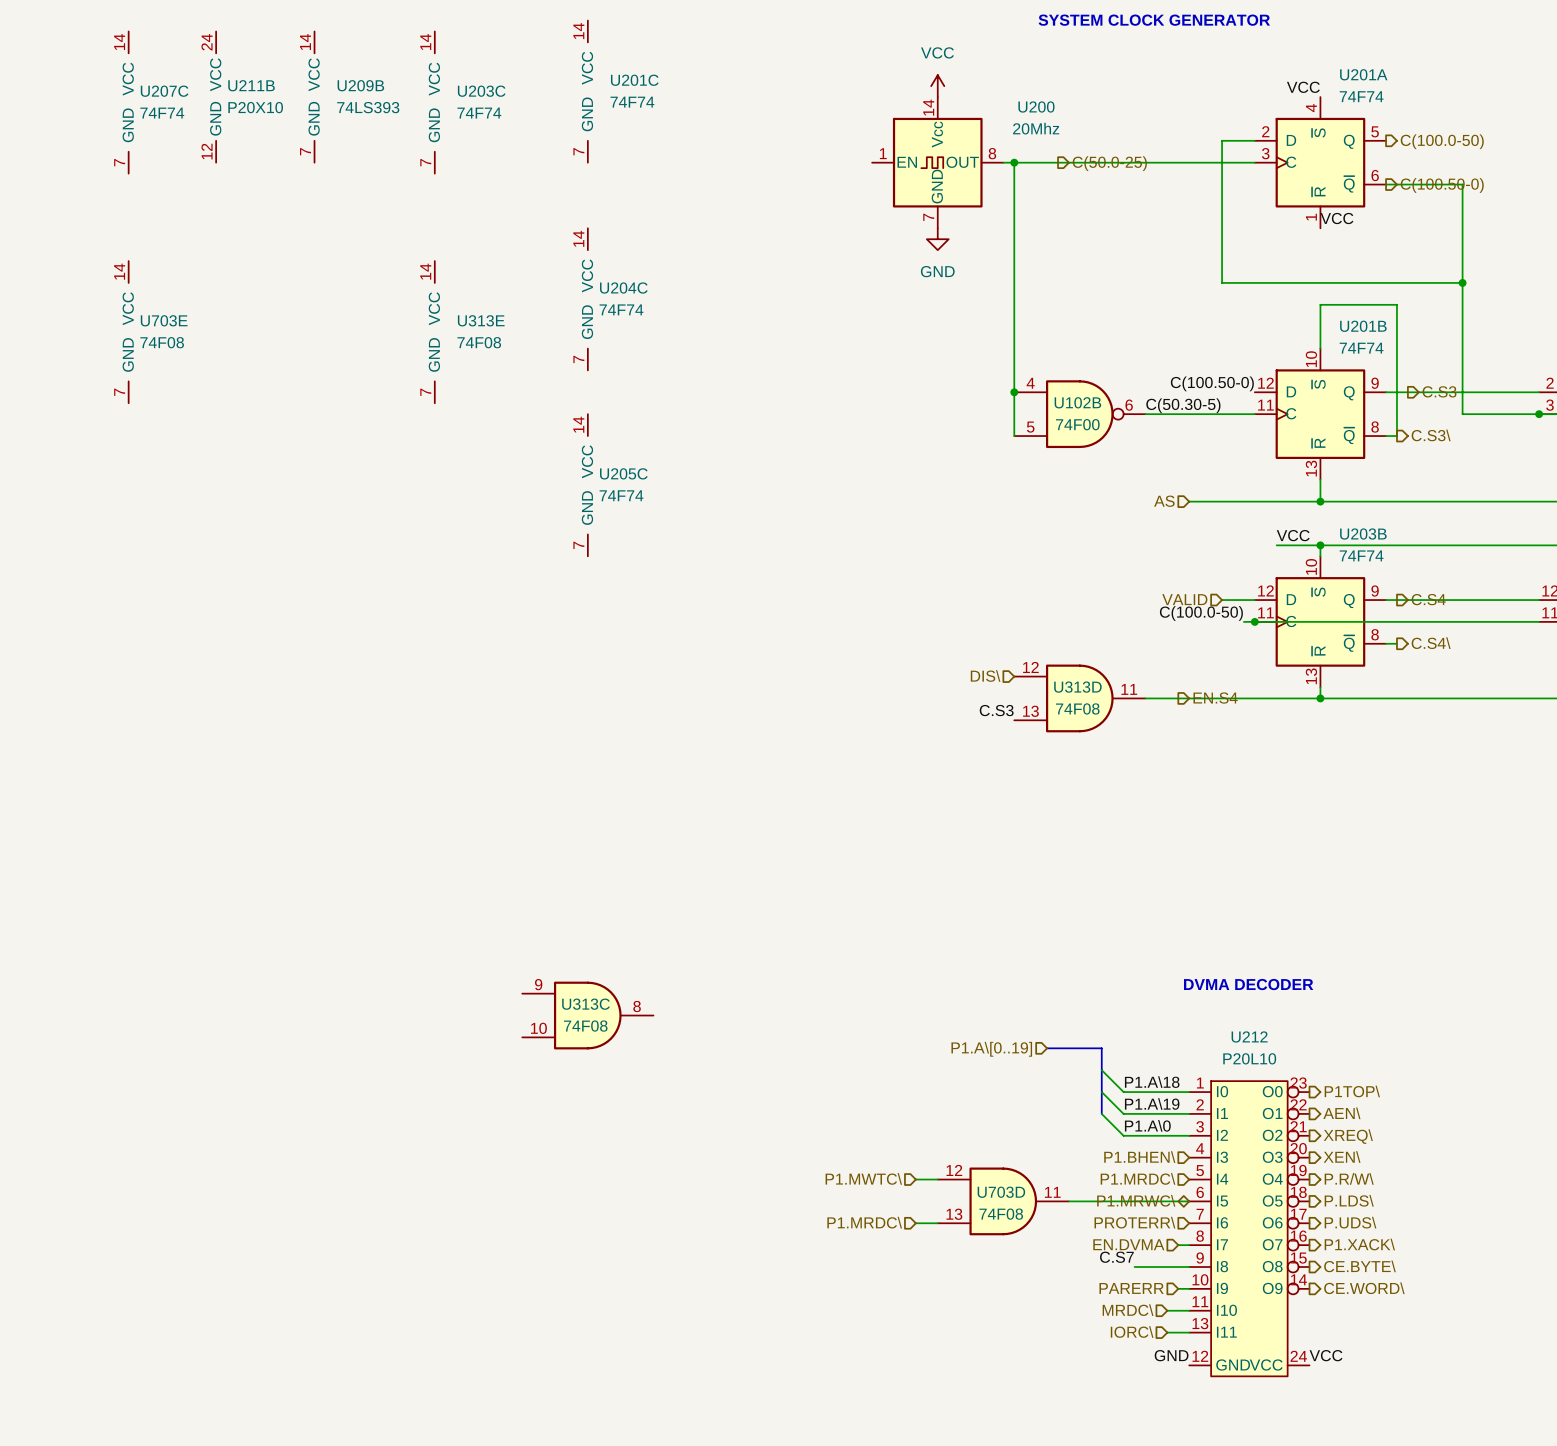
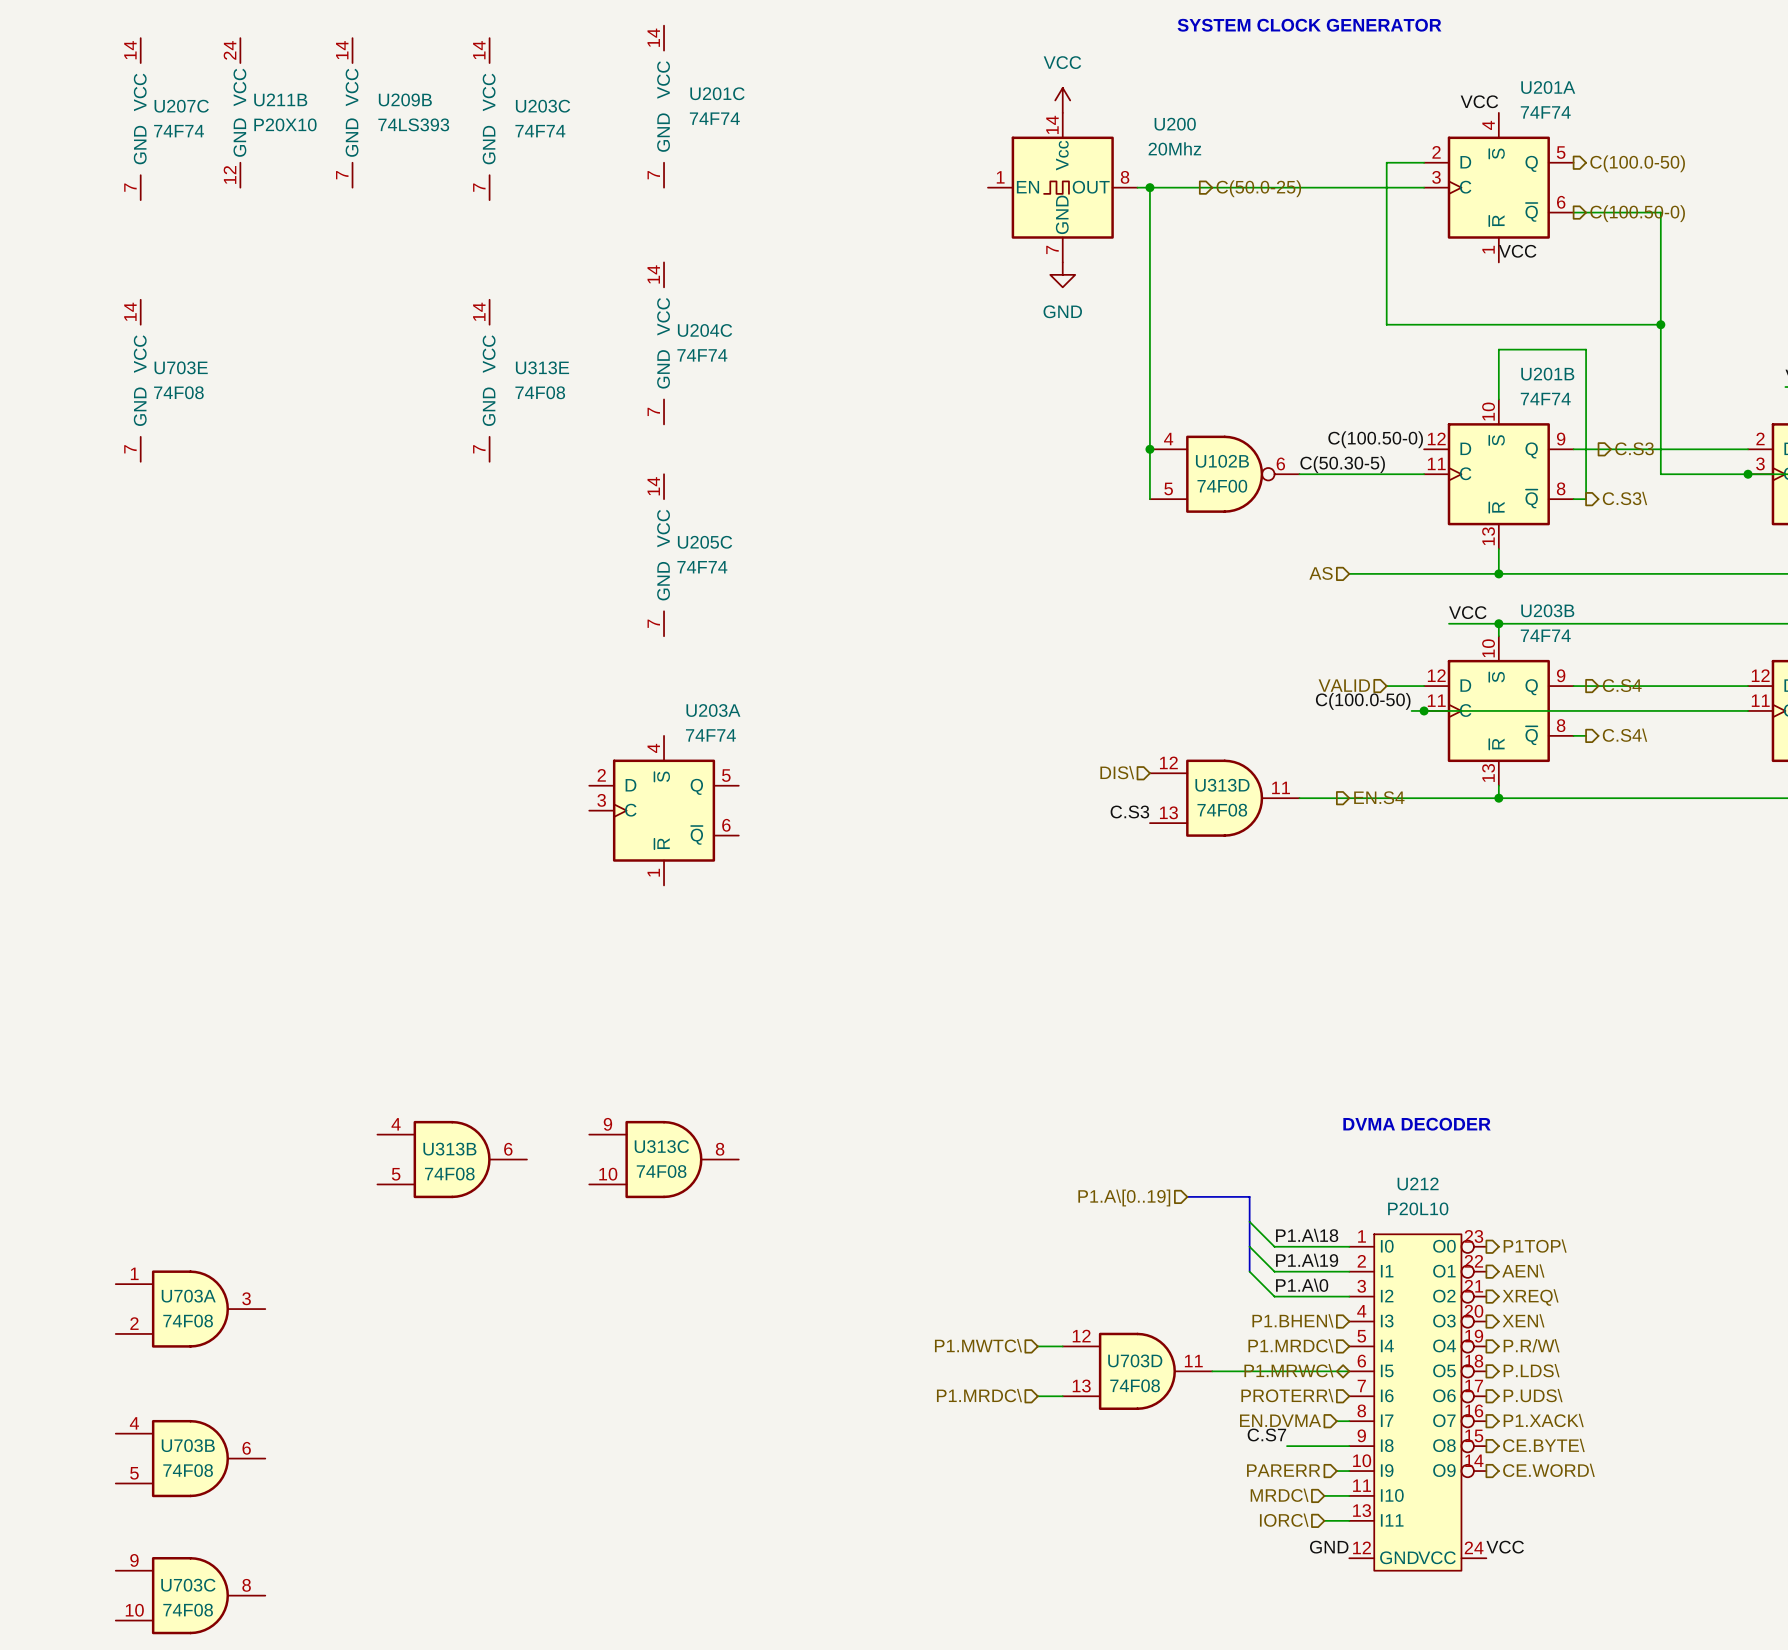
U203A: none -> 74F74 (664, 810)
U313B: none -> 74F08 (452, 1159)
U703A: none -> 74F08 (190, 1309)
U703B: none -> 74F08 (190, 1458)
U703C: none -> 74F08 (190, 1595)

